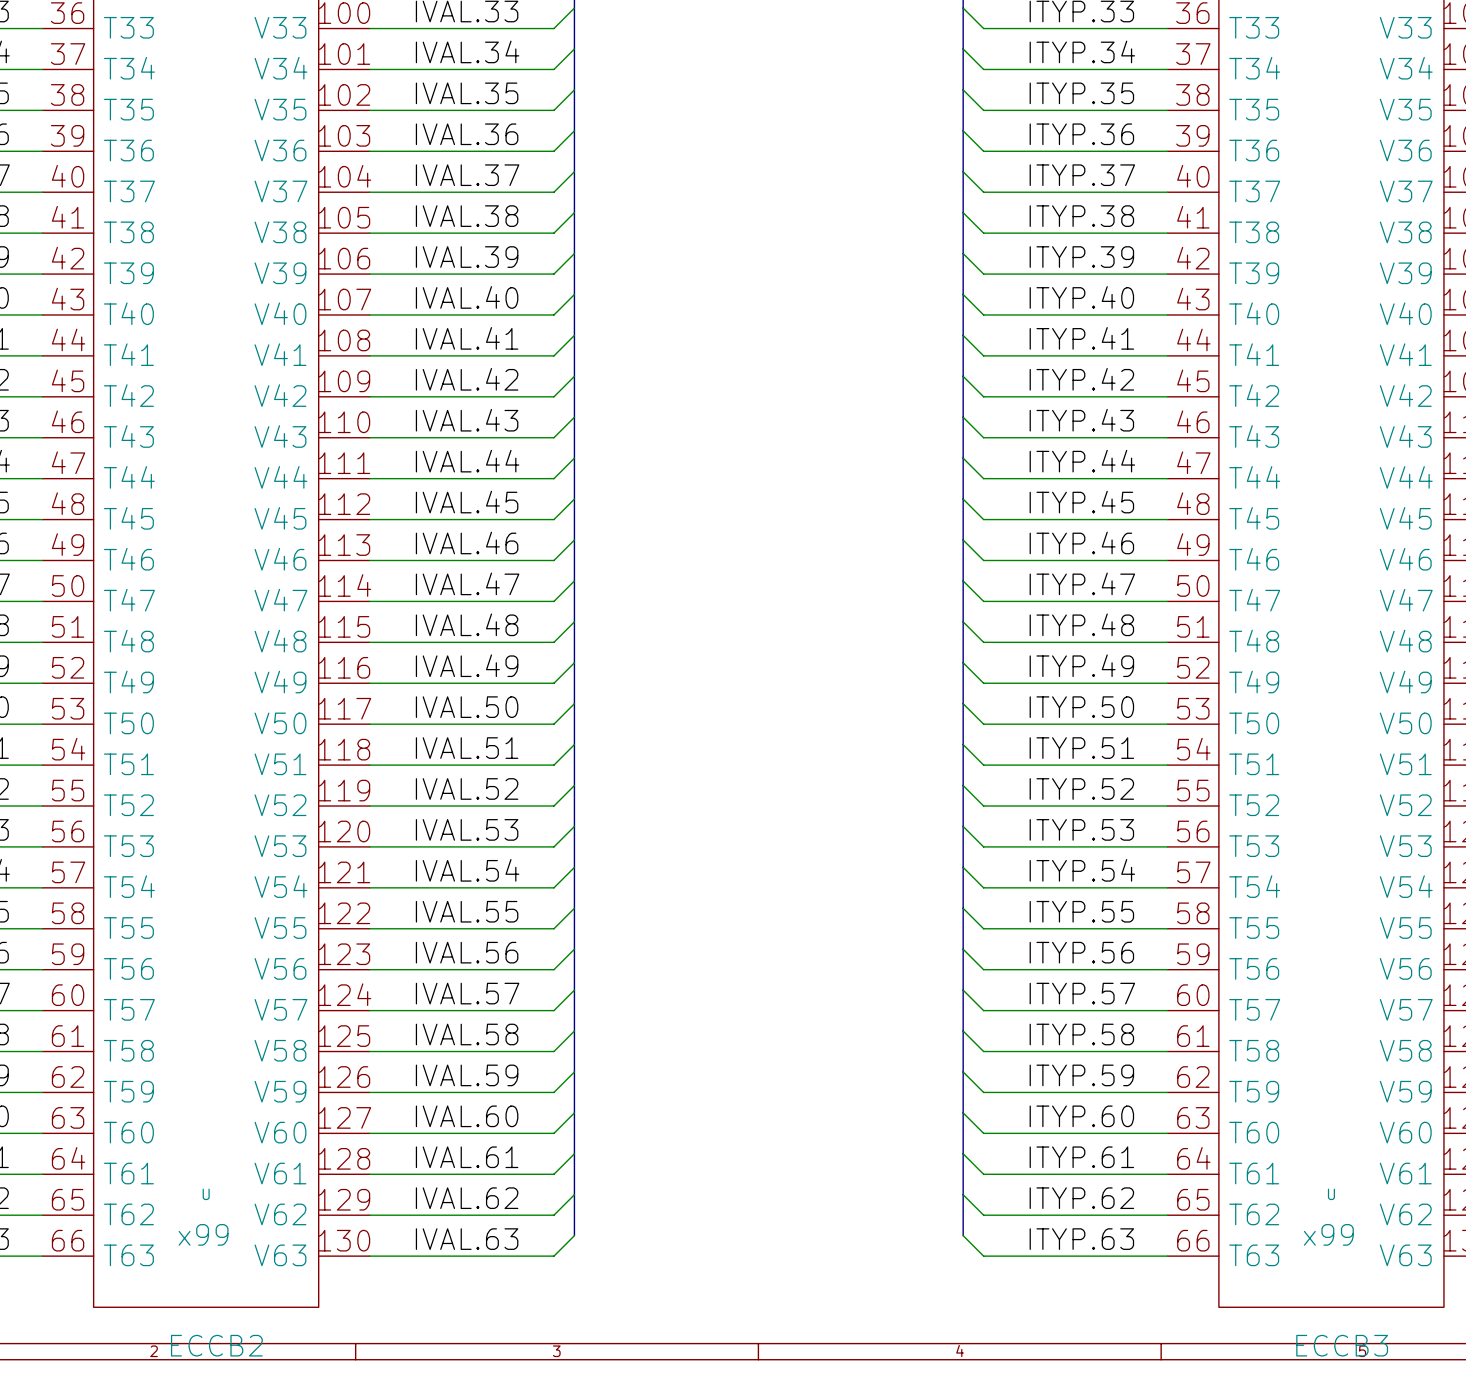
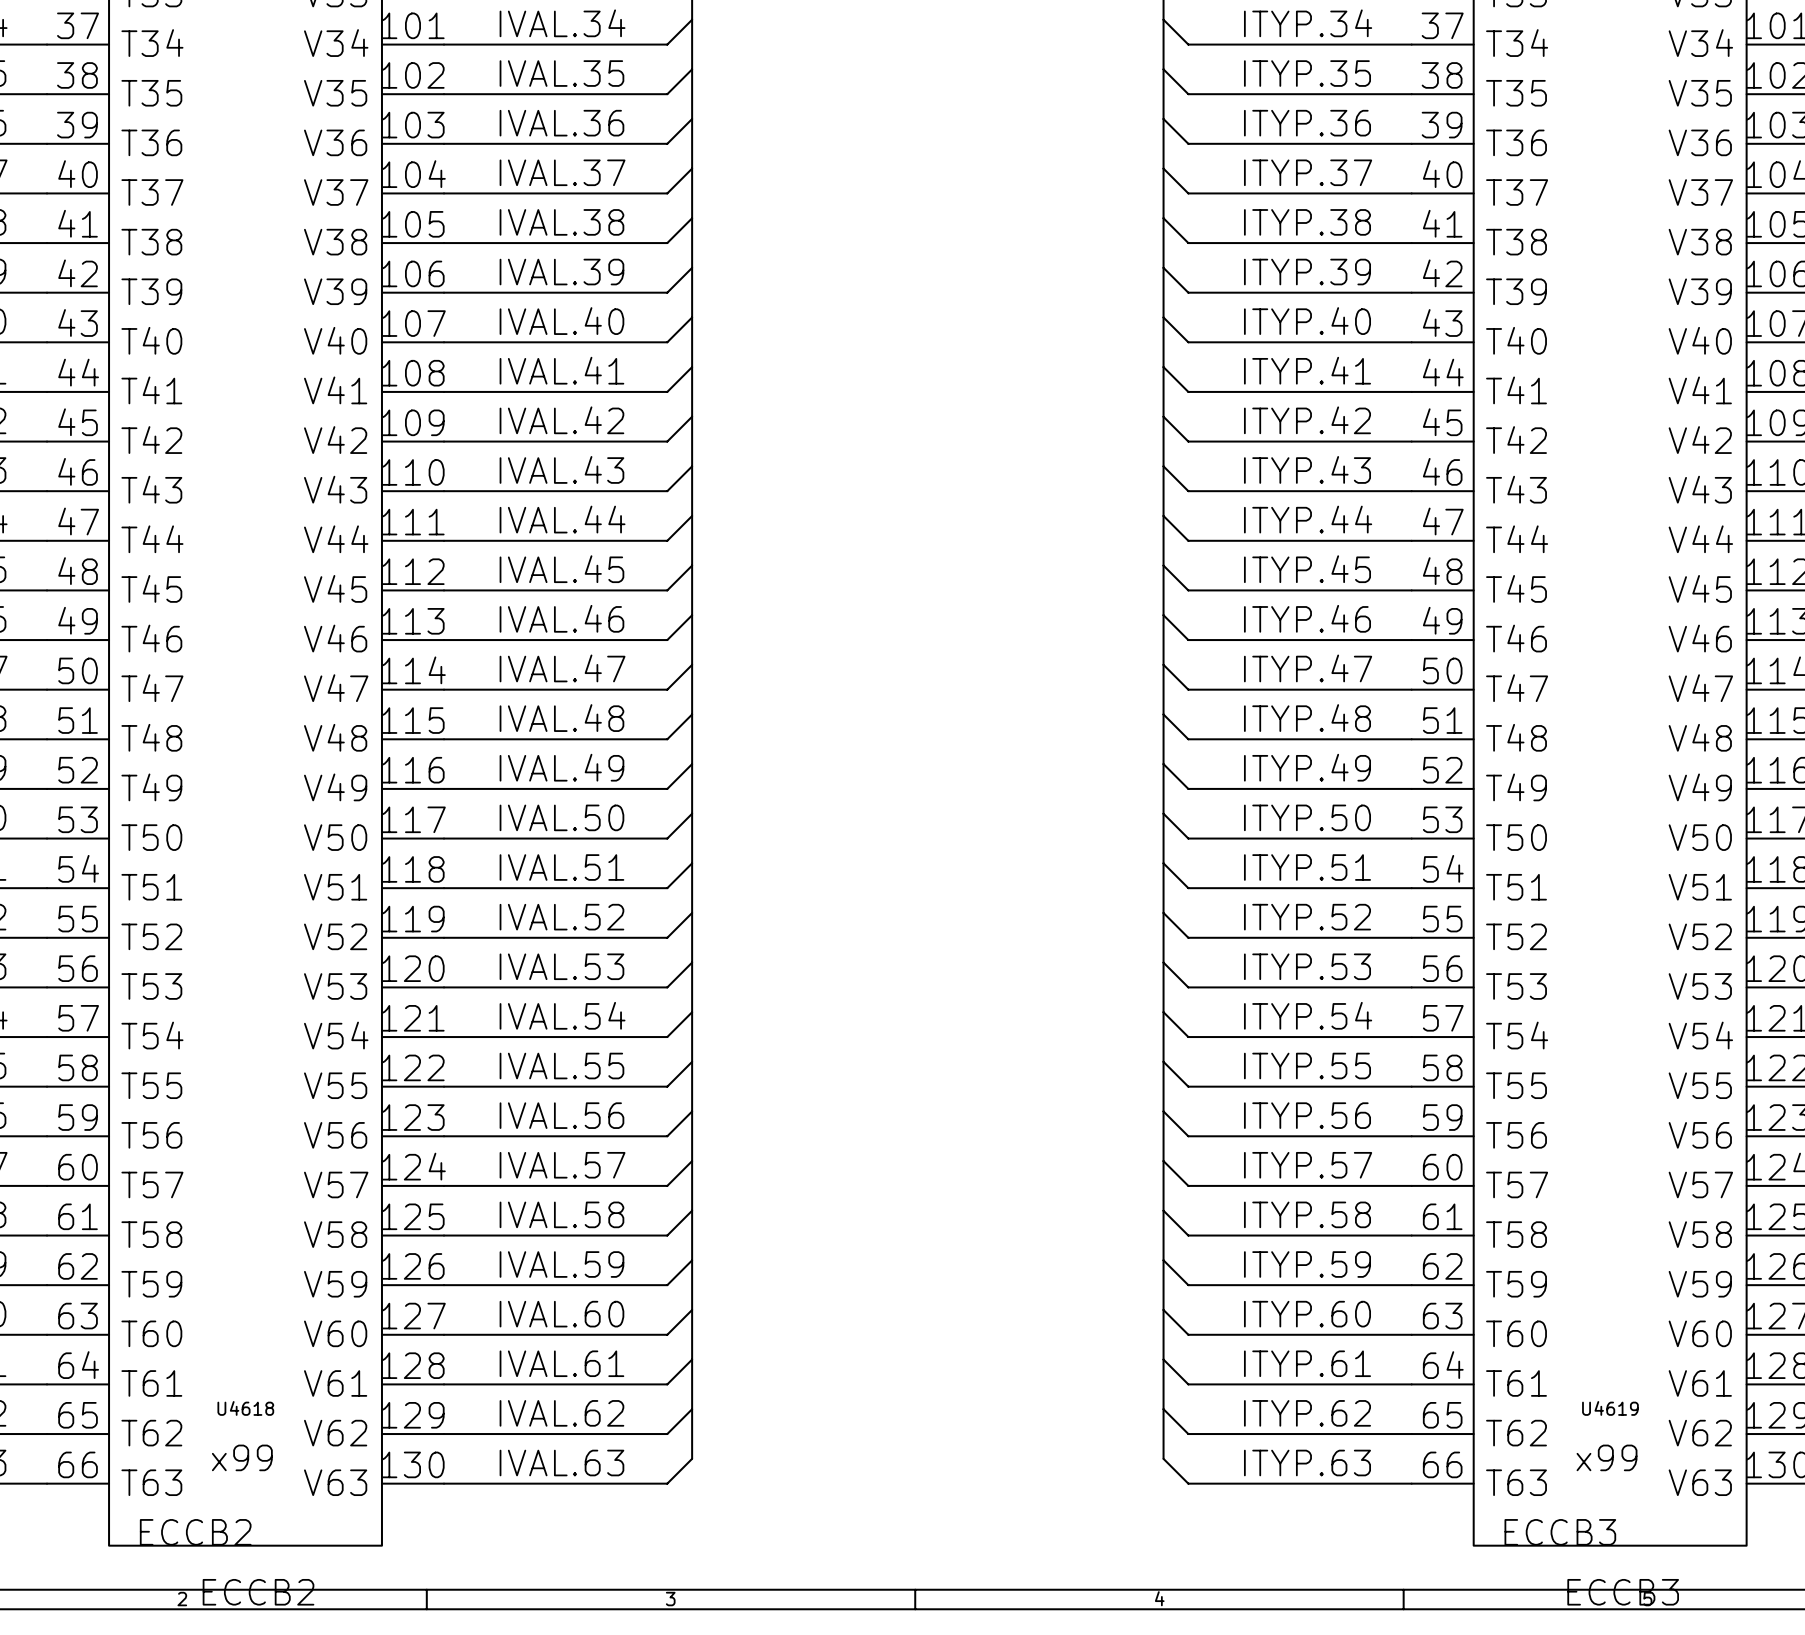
U name: U (206, 1194) -> U4618 (245, 1408)
U name: U (1331, 1194) -> U4619 (1610, 1408)
U value: none -> ECCB2 (195, 1532)
U value: none -> ECCB3 (1560, 1532)

